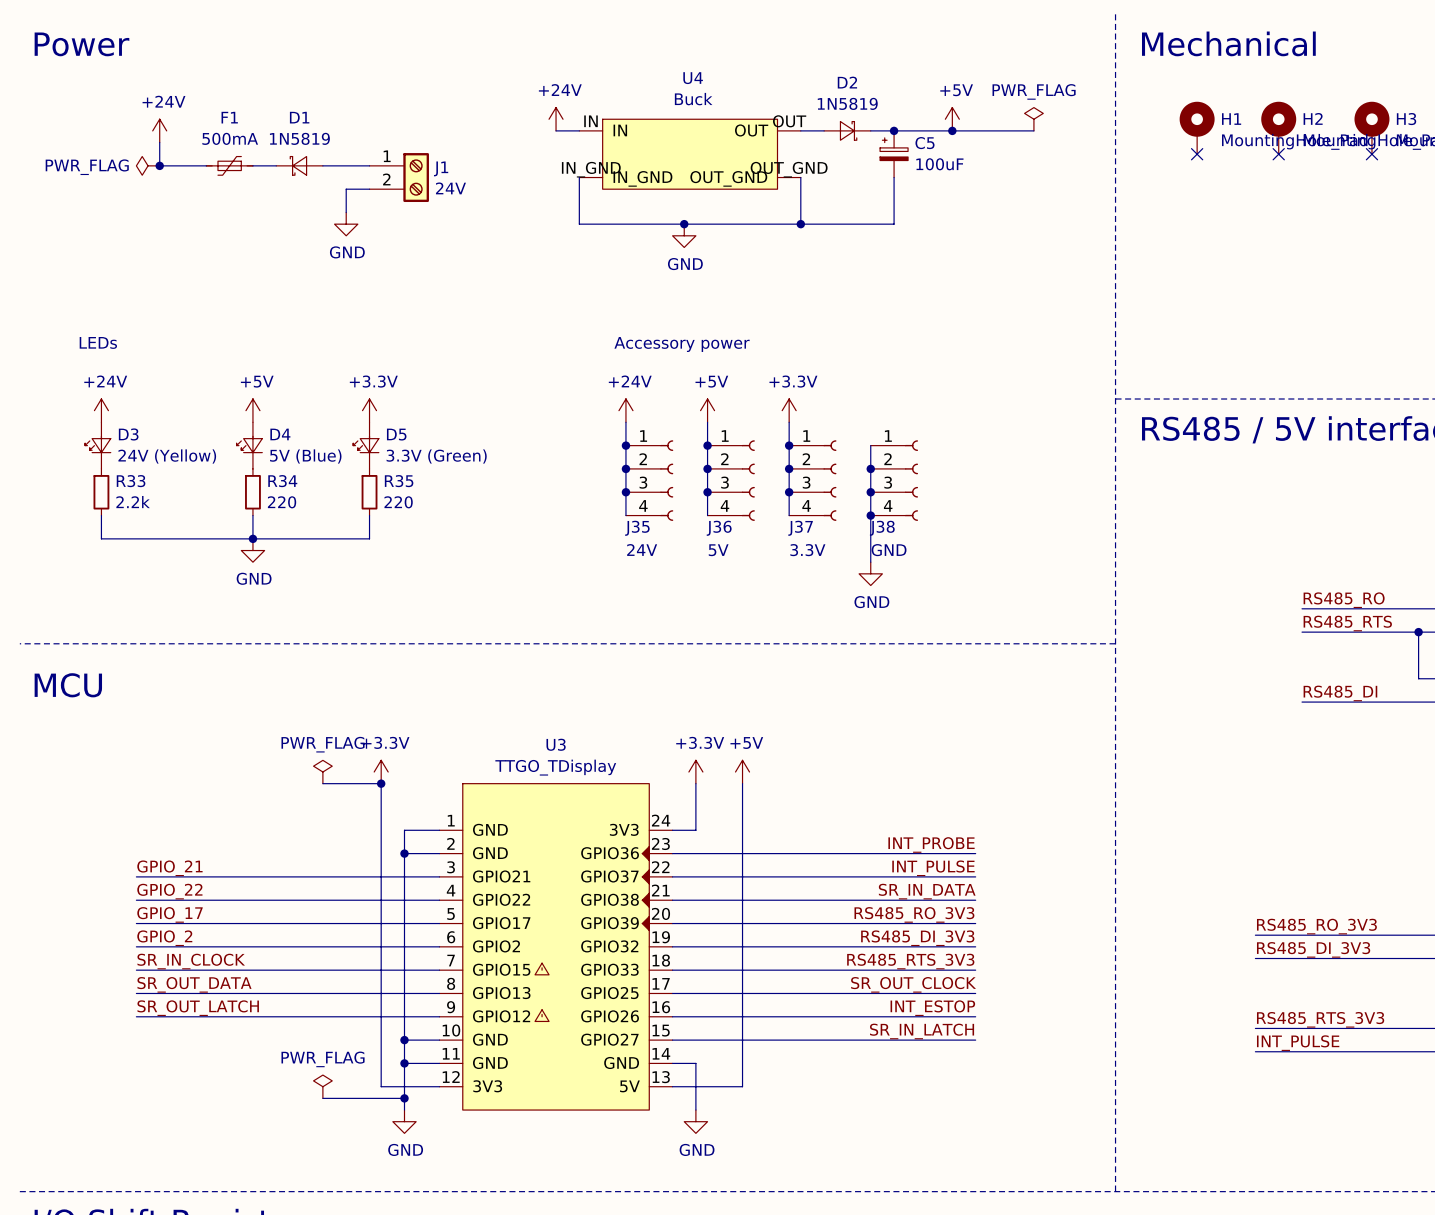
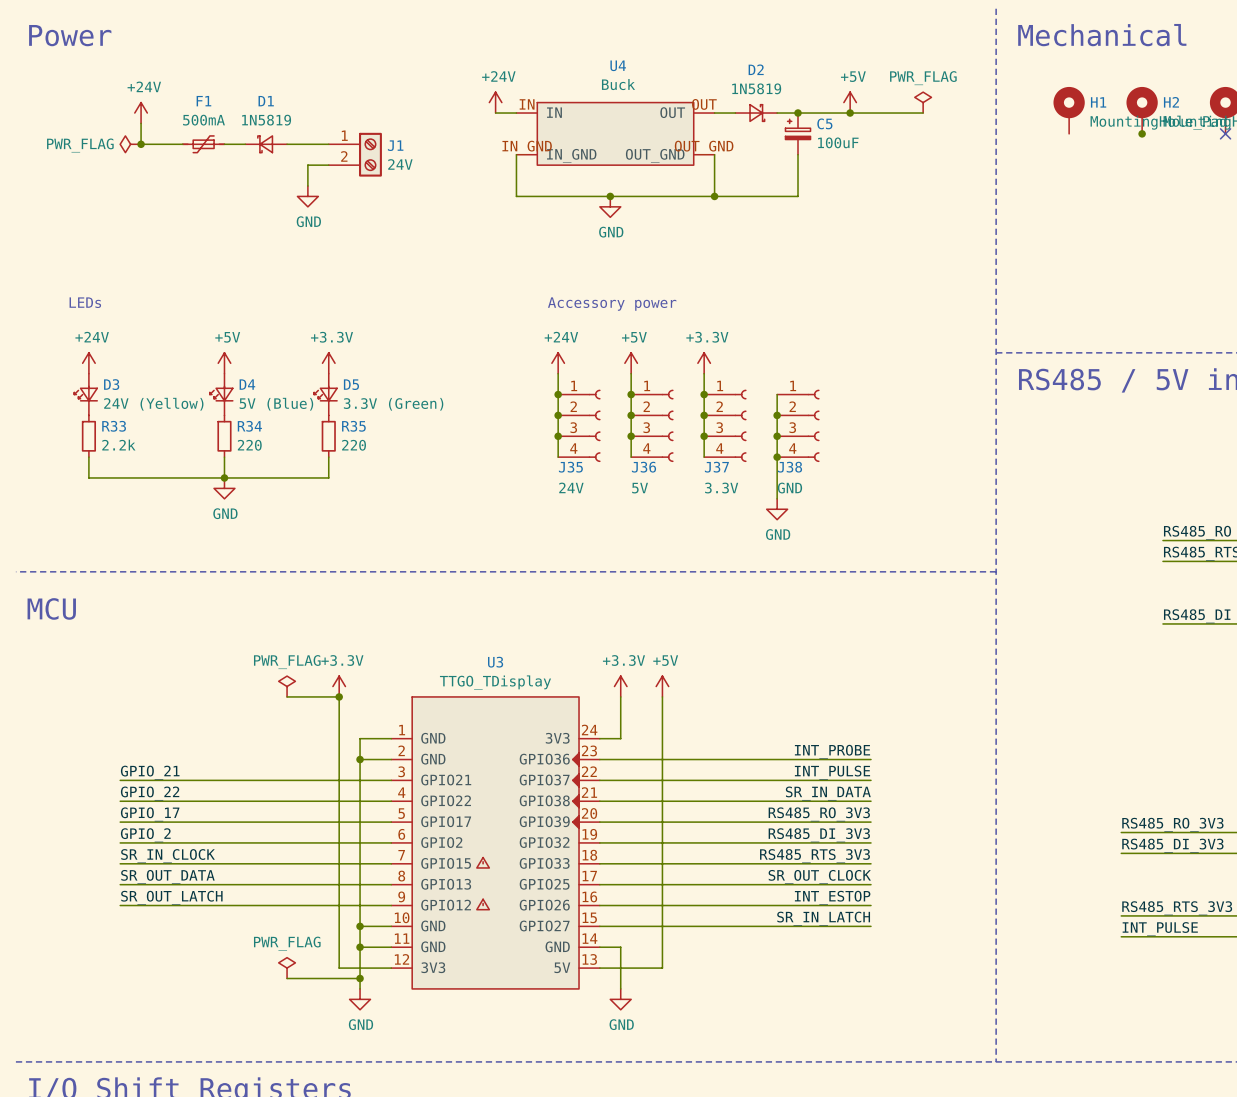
no-connect mark: (1197, 154) -> none
no-connect mark: (1278, 154) -> none
junction: none -> (1142, 133)

